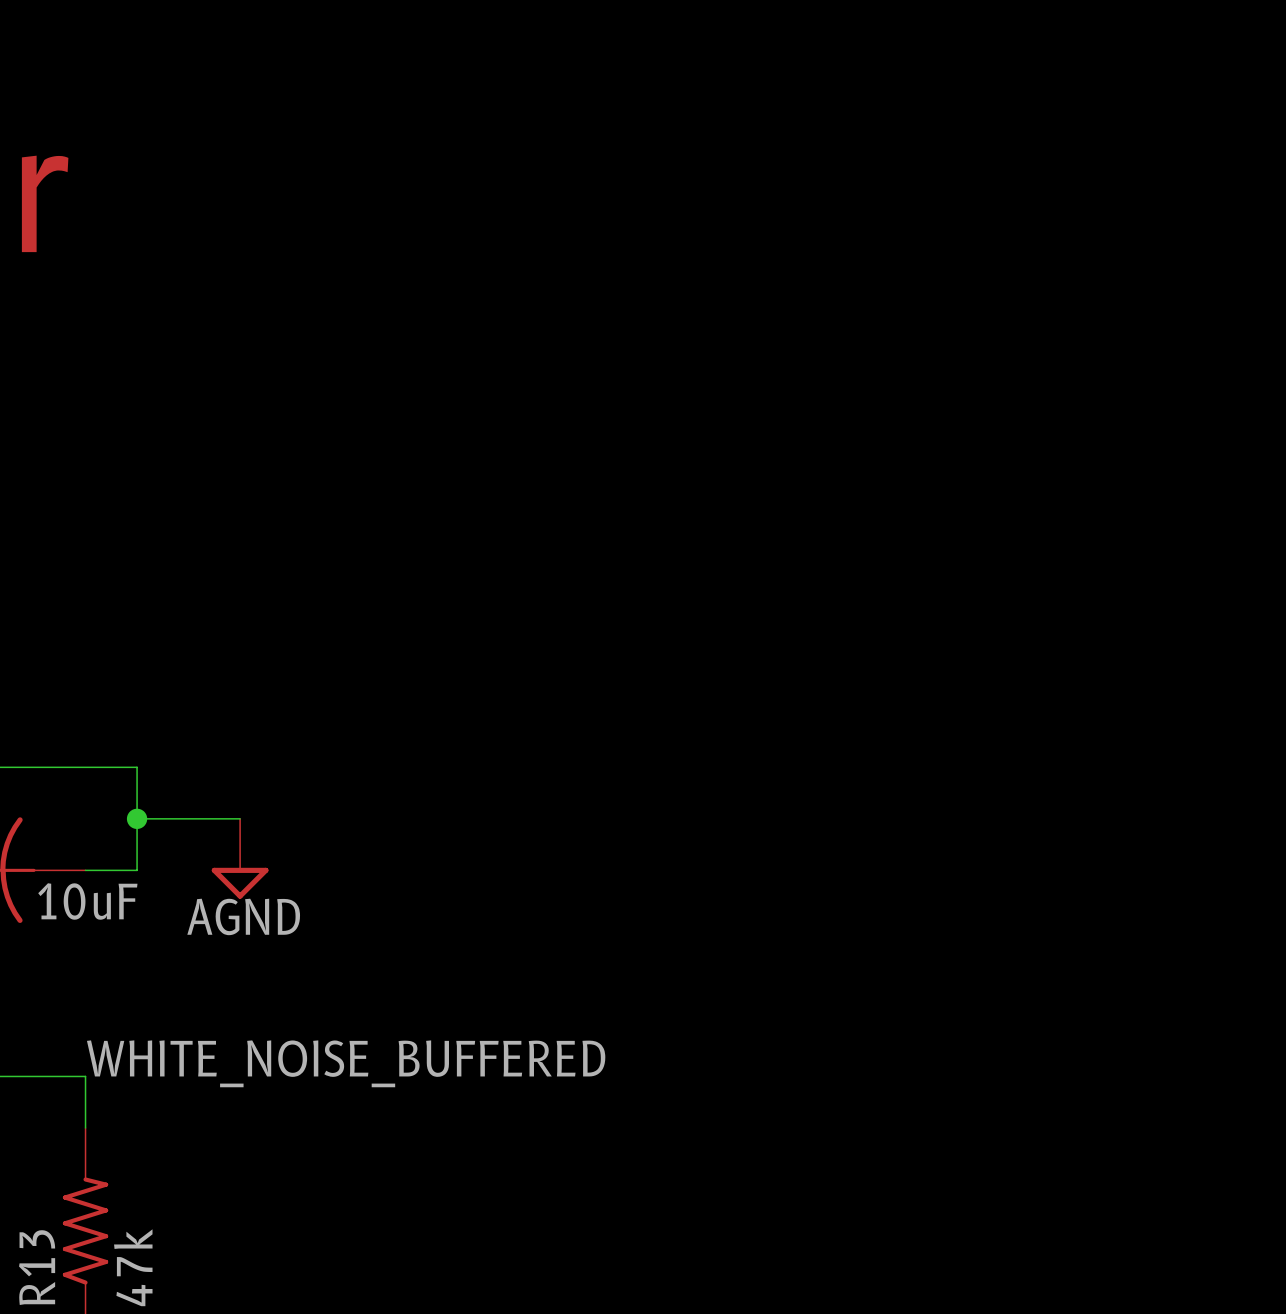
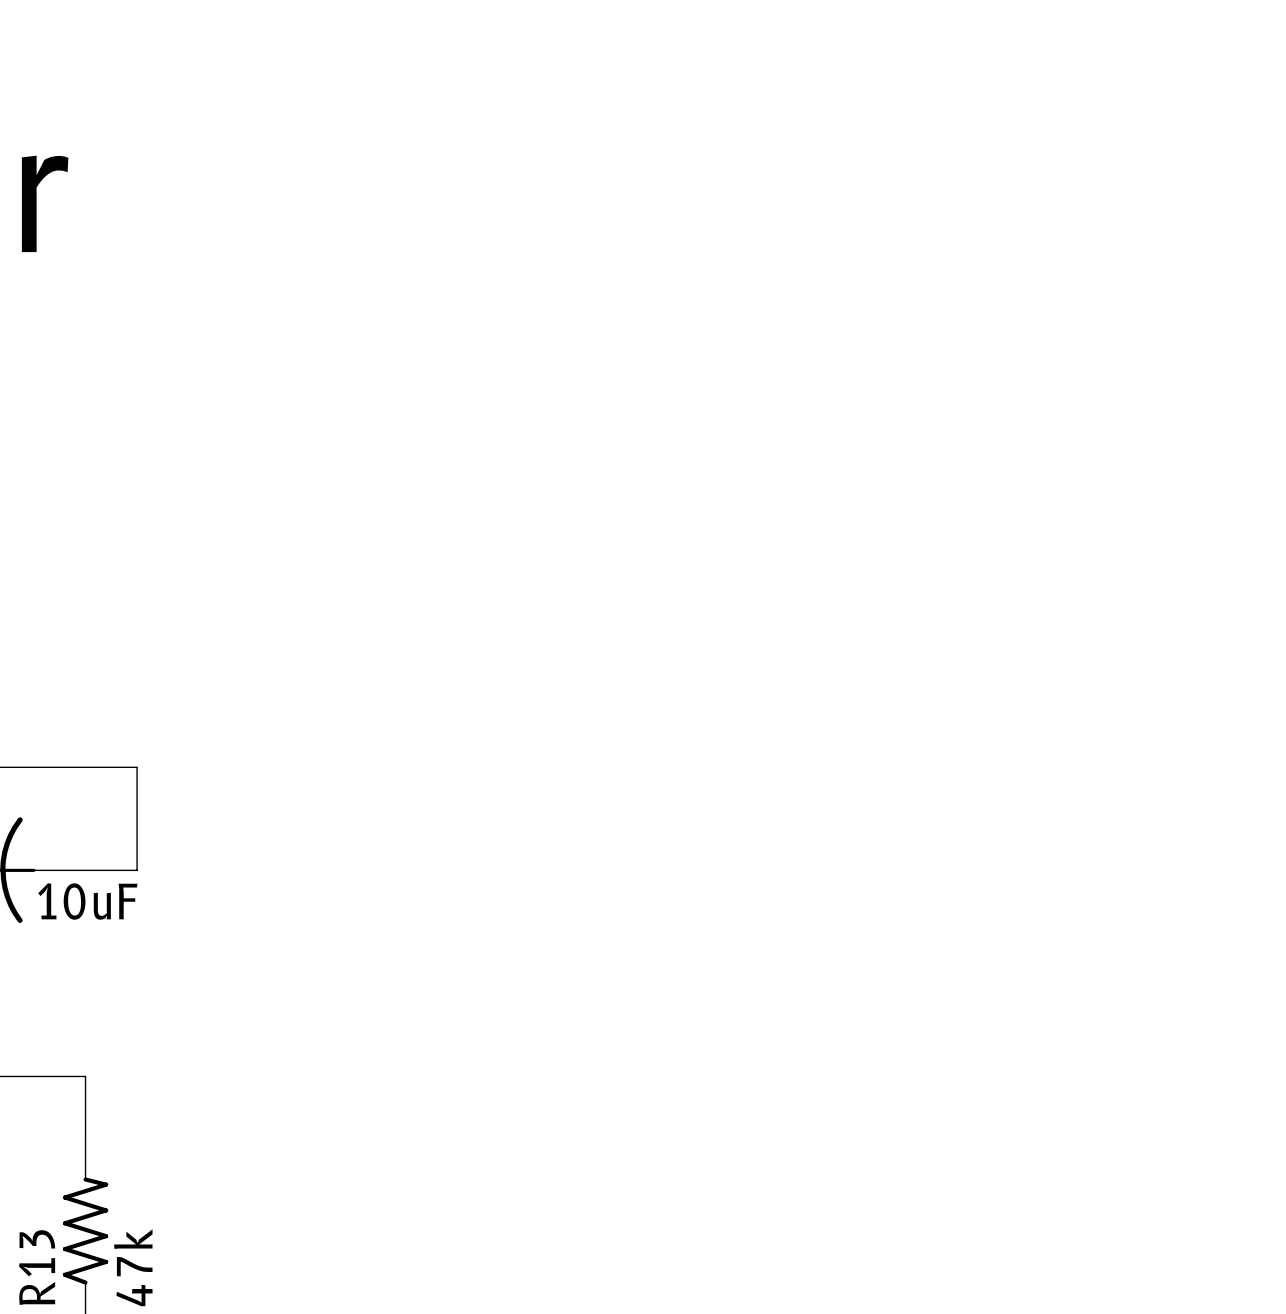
wire: (137, 818) (240, 818) -> none
junction: (137, 818) -> none
power symbol: AGND (240, 858) -> none
label: WHITE_NOISE_BUFFERED (346, 1063) -> none

